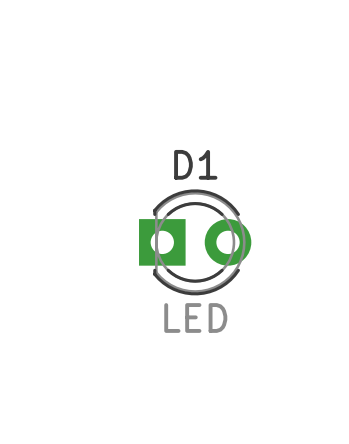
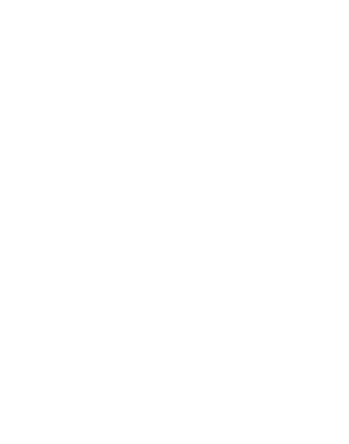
D1: LED (195, 242) -> none

